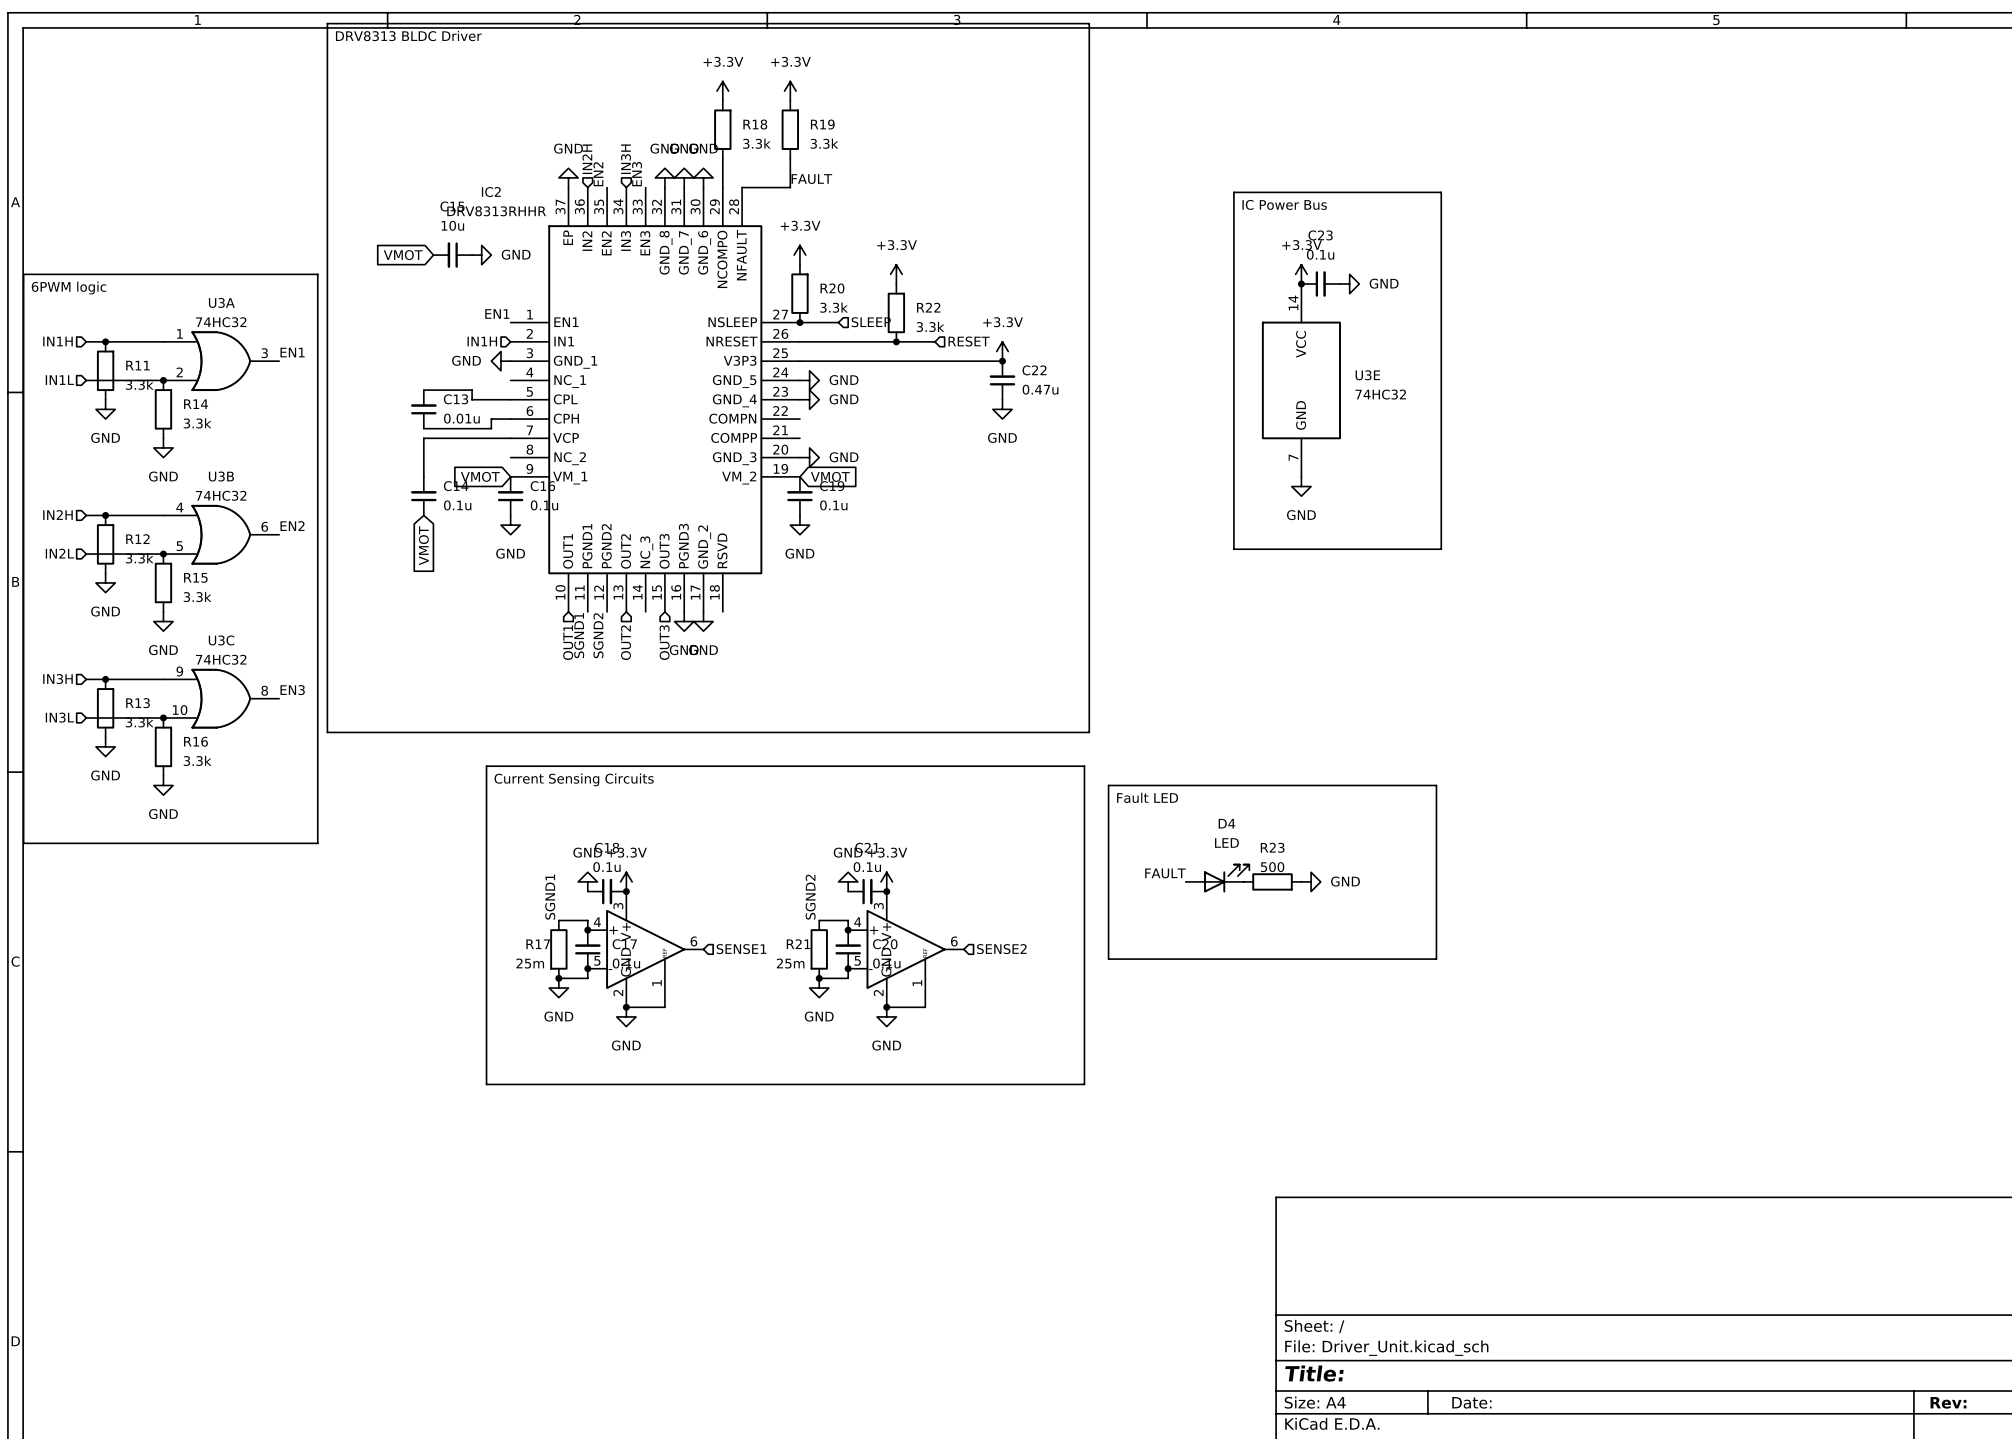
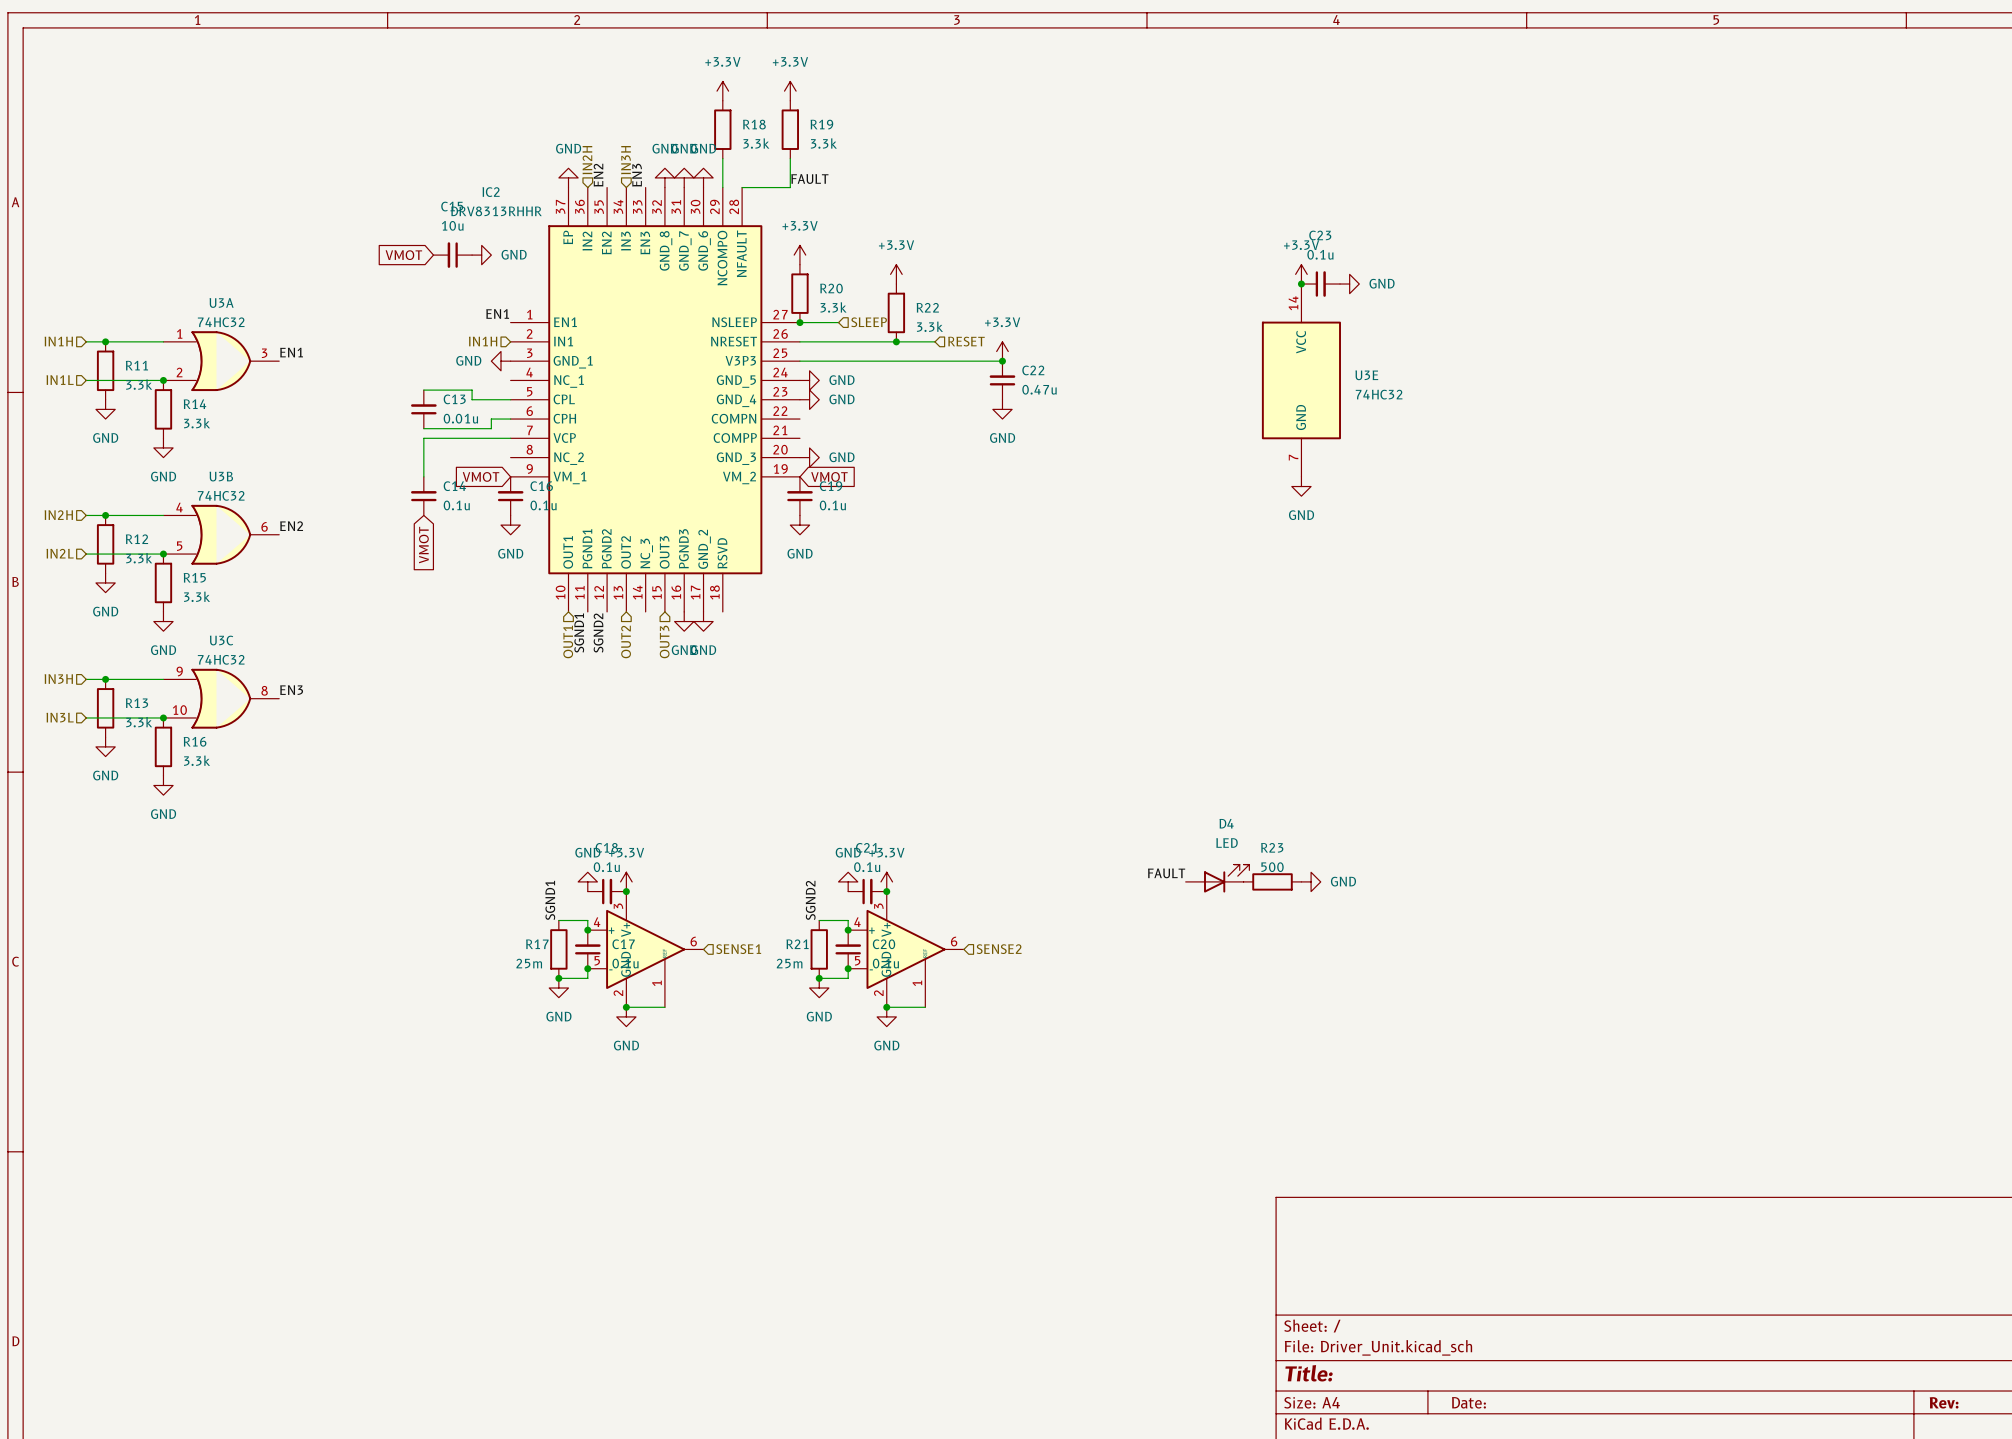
line: (327, 23) (1089, 23) (1089, 732) (327, 732) (327, 23) -> none
text: DRV8313 BLDC Driver (408, 36) -> none
line: (1233, 192) (1441, 192) (1441, 549) (1233, 549) (1233, 192) -> none
text: IC Power Bus (1284, 204) -> none
line: (23, 274) (317, 274) (317, 843) (23, 843) (23, 274) -> none
text: 6PWM logic (69, 288) -> none
line: (486, 766) (1084, 766) (1084, 1084) (486, 1084) (486, 766) -> none
text: Current Sensing Circuits (574, 779) -> none
line: (1108, 785) (1436, 785) (1436, 959) (1108, 959) (1108, 785) -> none
text: Fault LED (1147, 797) -> none

